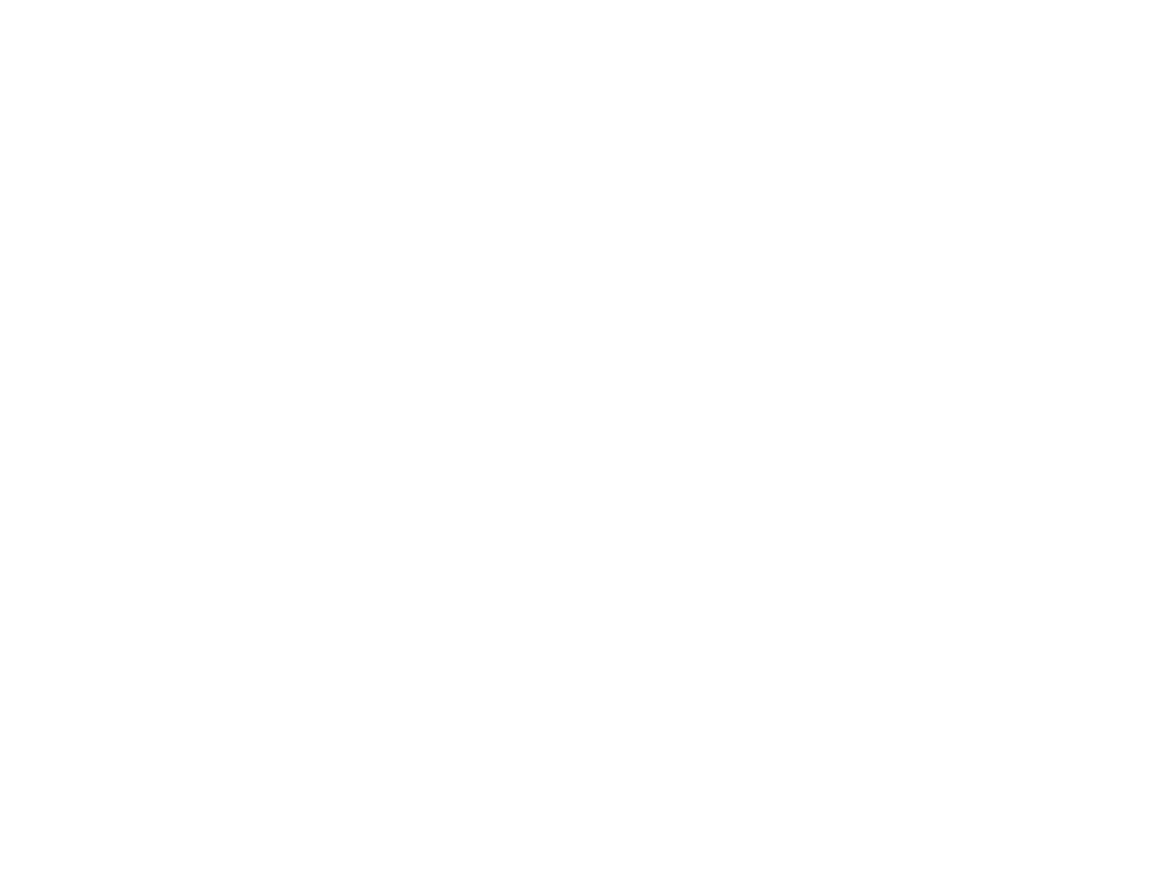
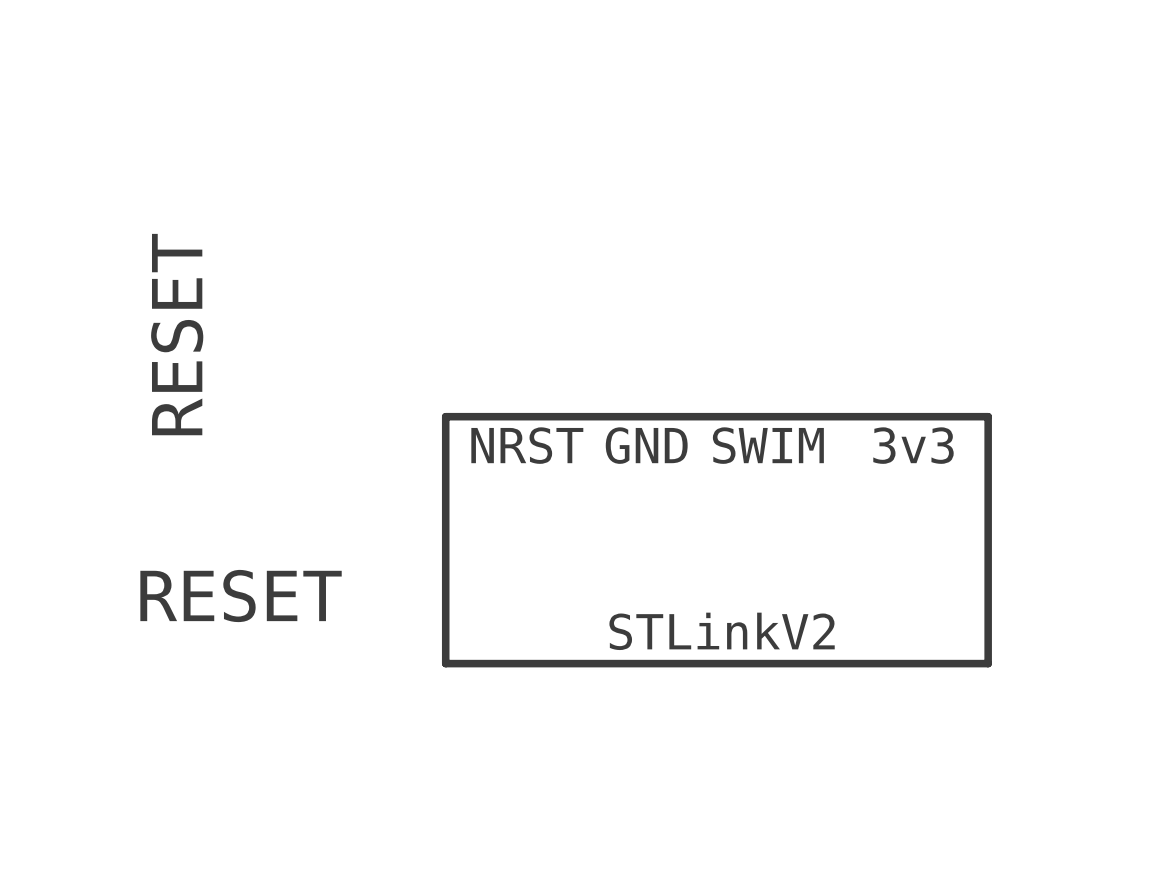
text: none -> RESET (177, 334)
line: none -> (445, 416) (988, 416) (988, 663) (445, 663) (445, 416)
text: none -> NRST (527, 445)
text: none -> GND (646, 445)
text: none -> SWIM (768, 445)
text: none -> 3v3 (913, 445)
text: none -> RESET (241, 596)
text: none -> STLinkV2 (722, 631)

